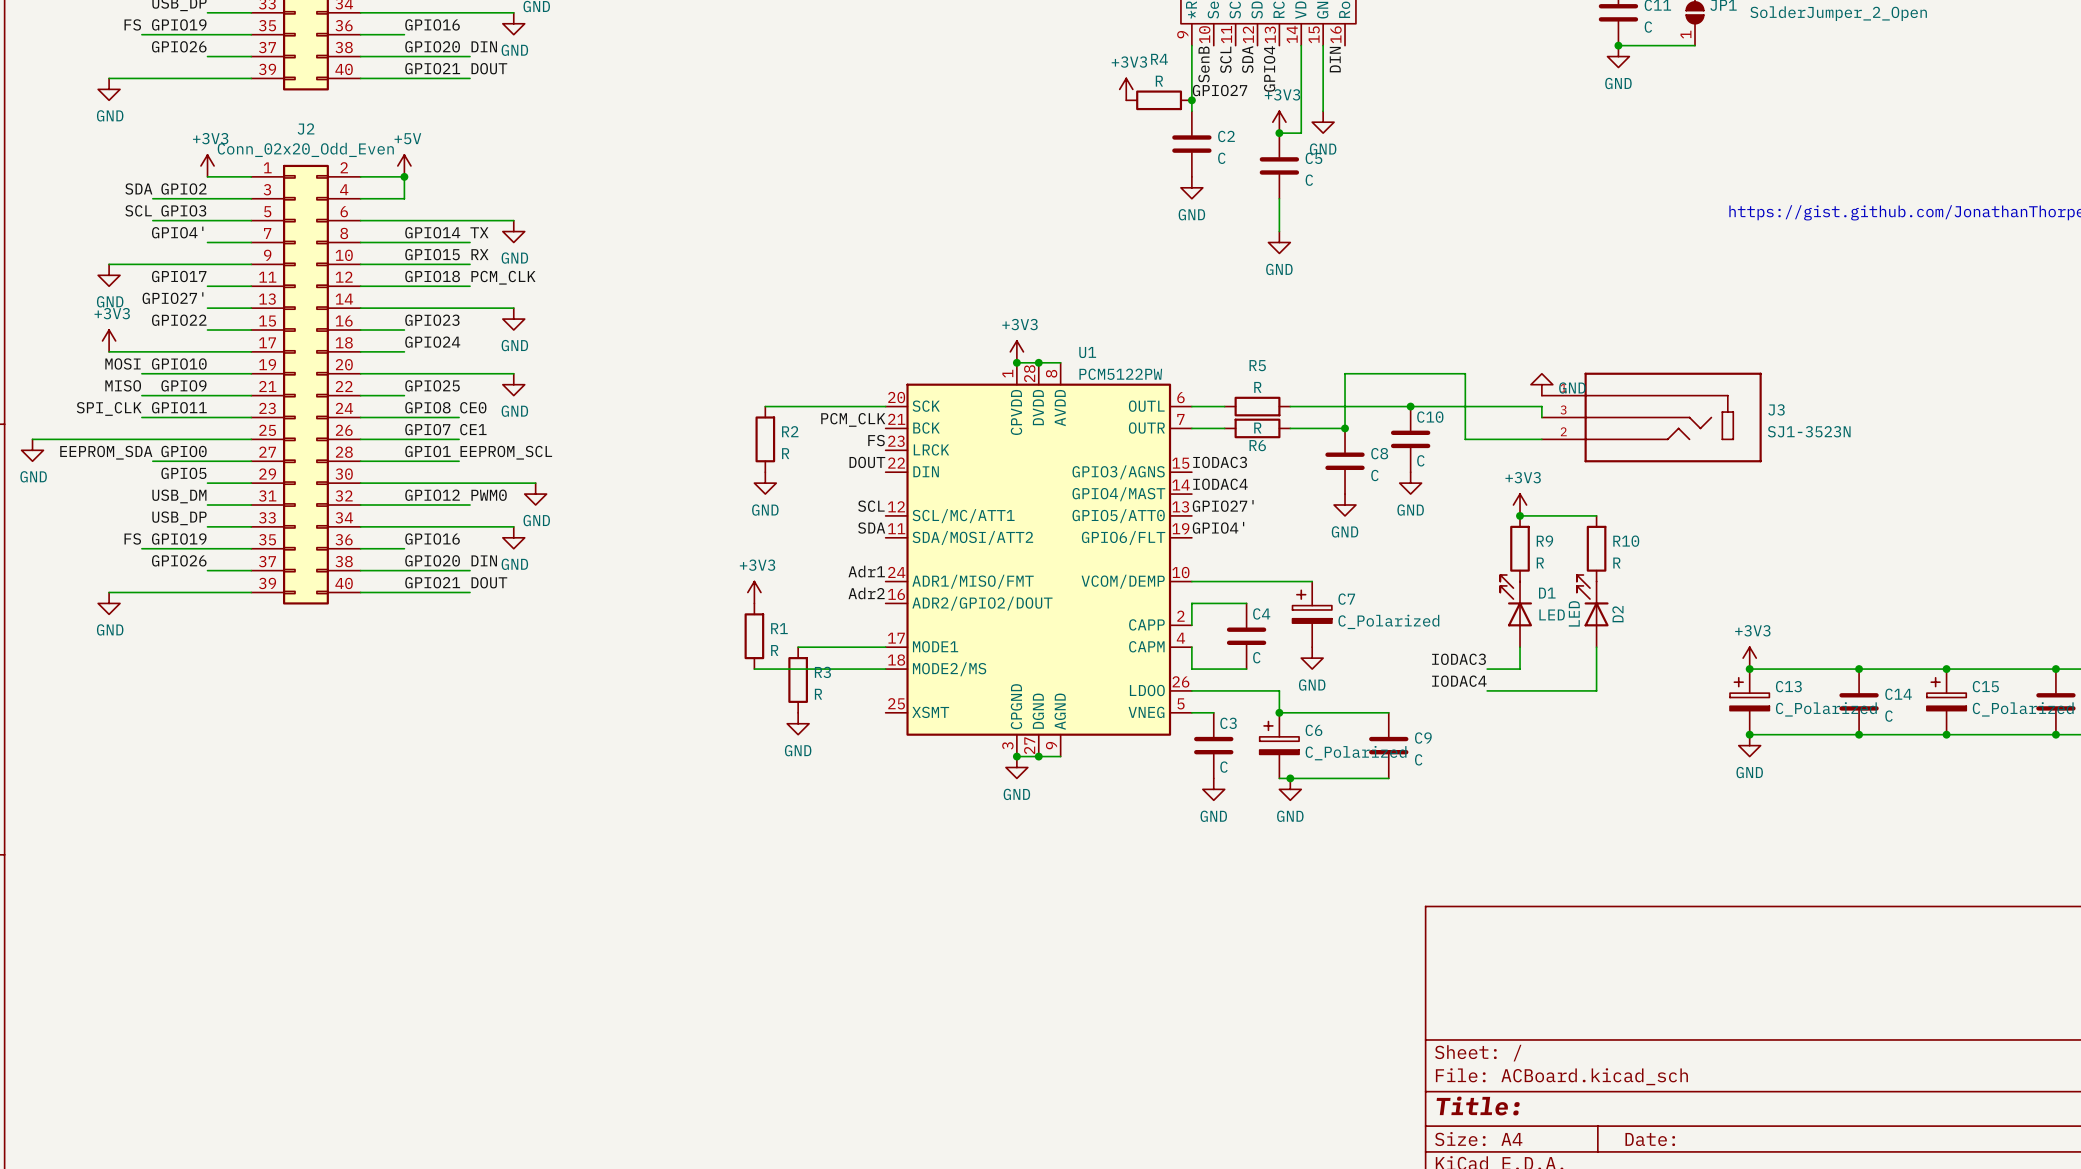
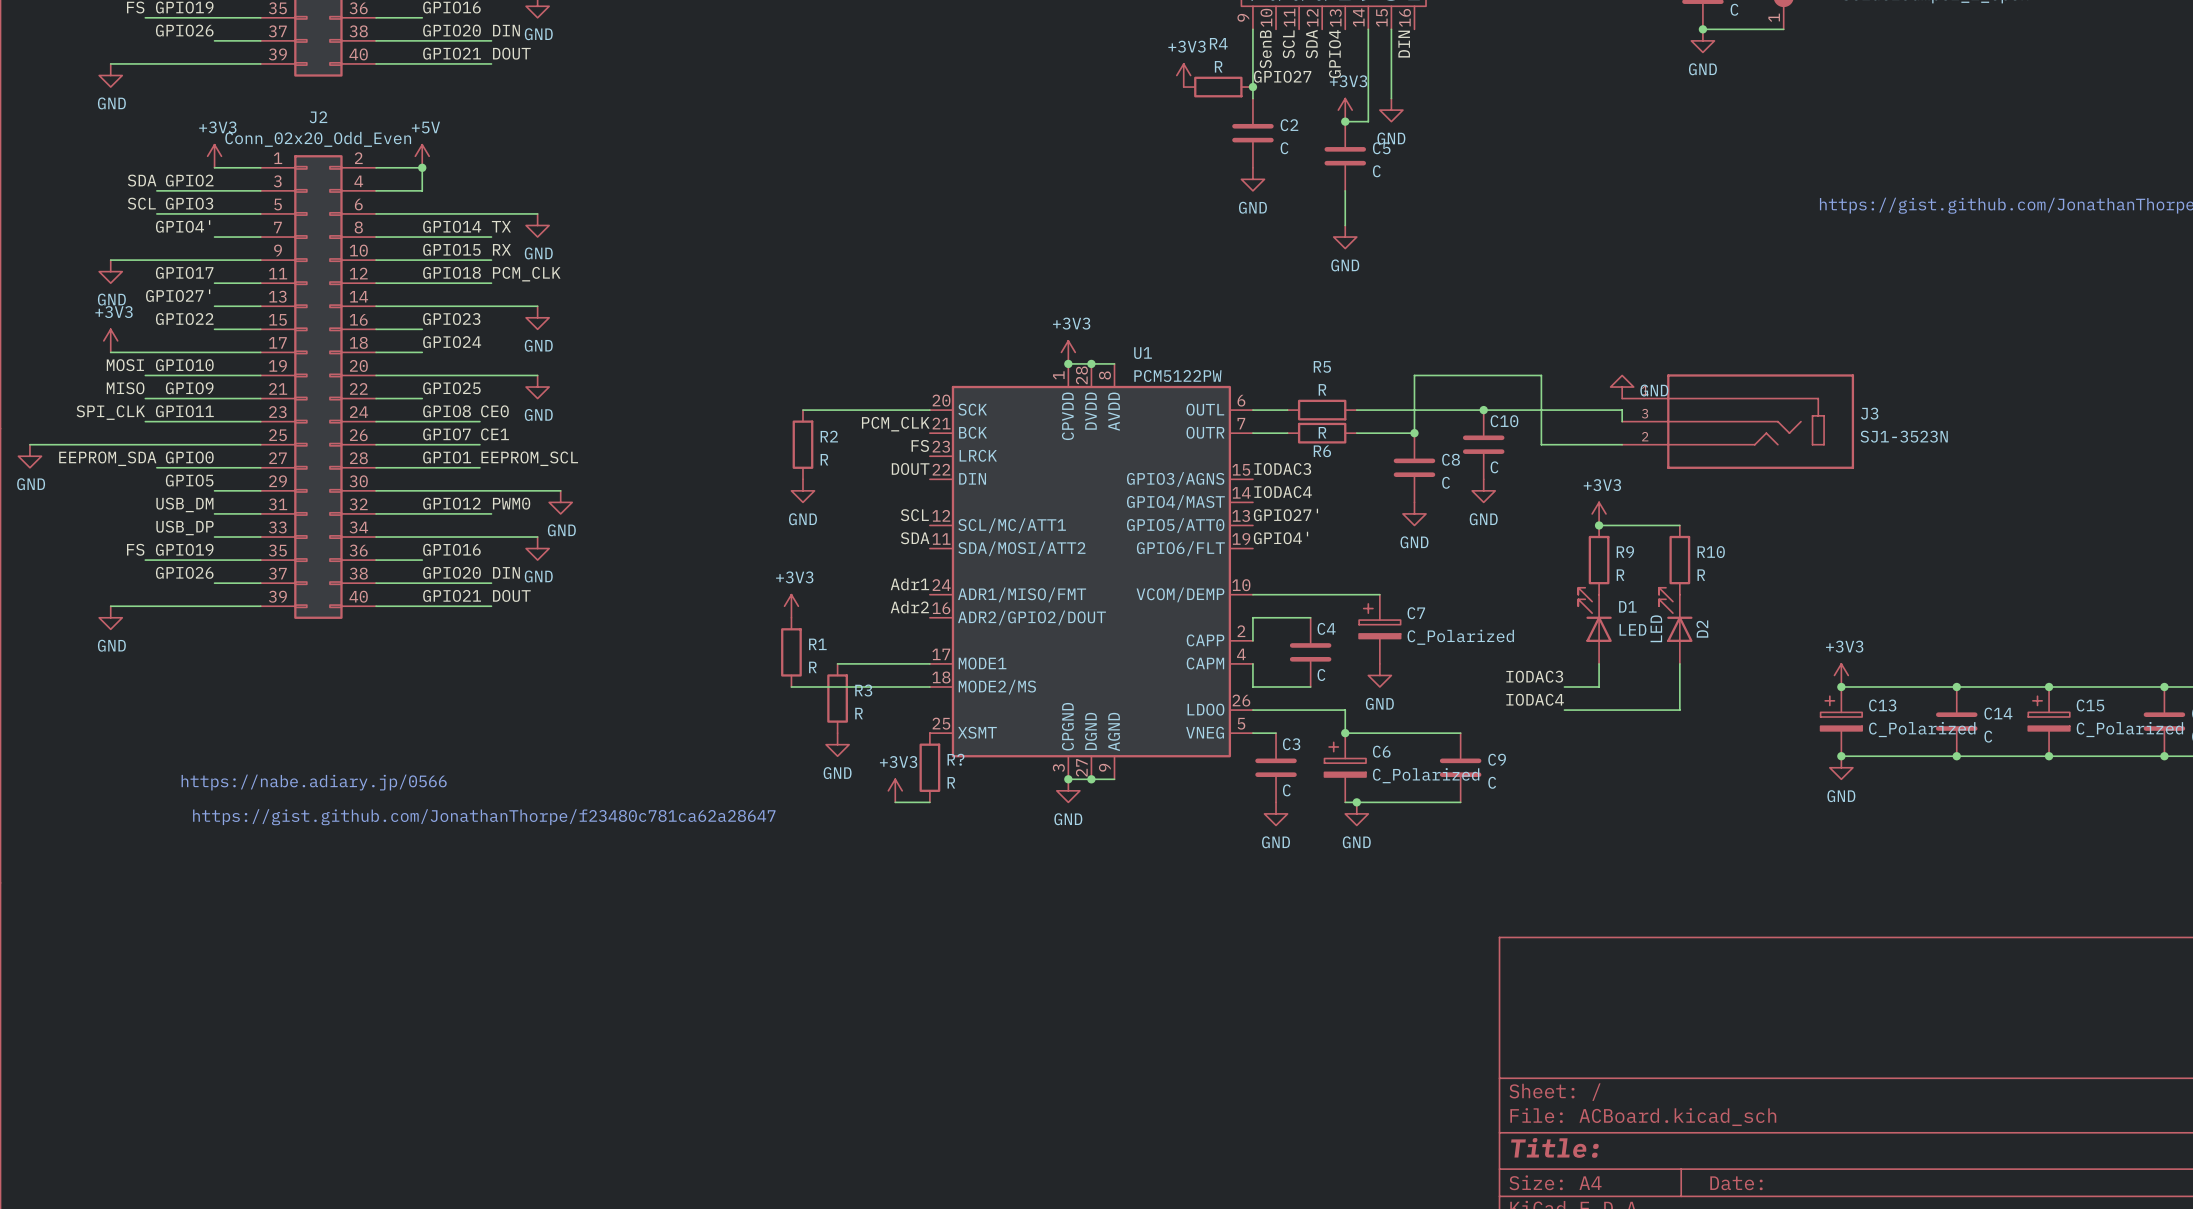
R?: none -> R (929, 767)
text: none -> https://nabe.adiary.jp/0566 (314, 782)
power symbol: none -> +3V3 (895, 790)
wire: none -> (895, 802) (929, 802)
text: none -> https://gist.github.com/JonathanThorpe/f23480c781ca62a28647 (484, 817)

